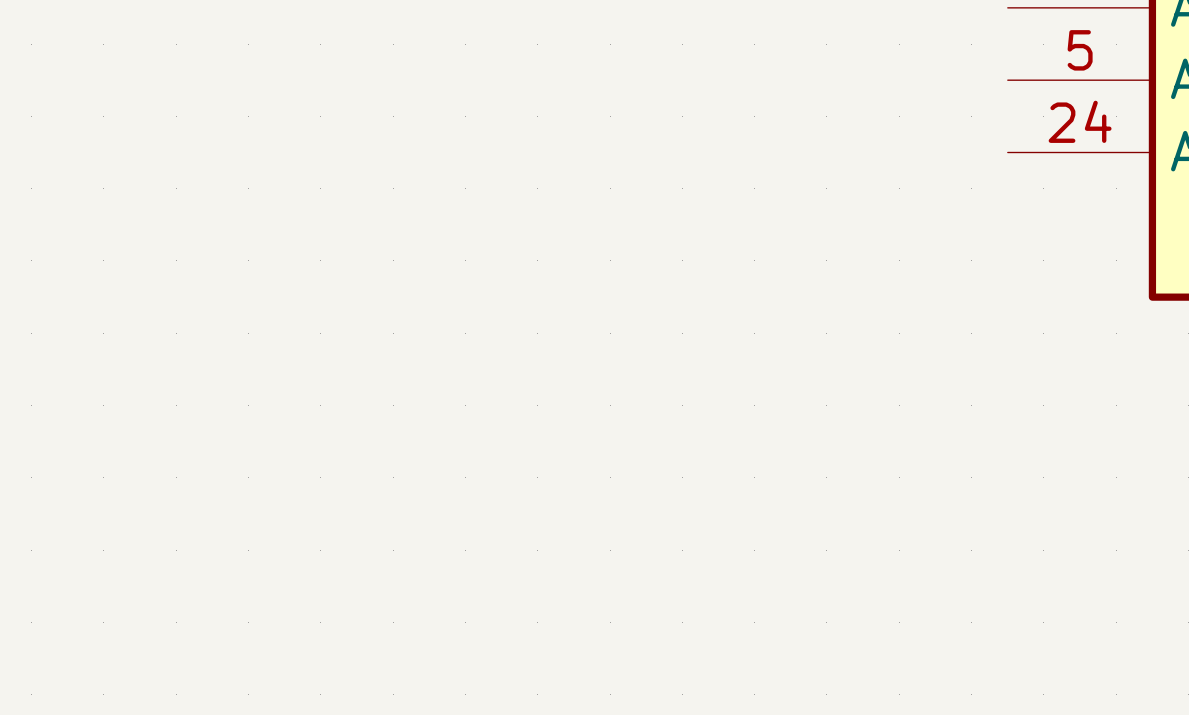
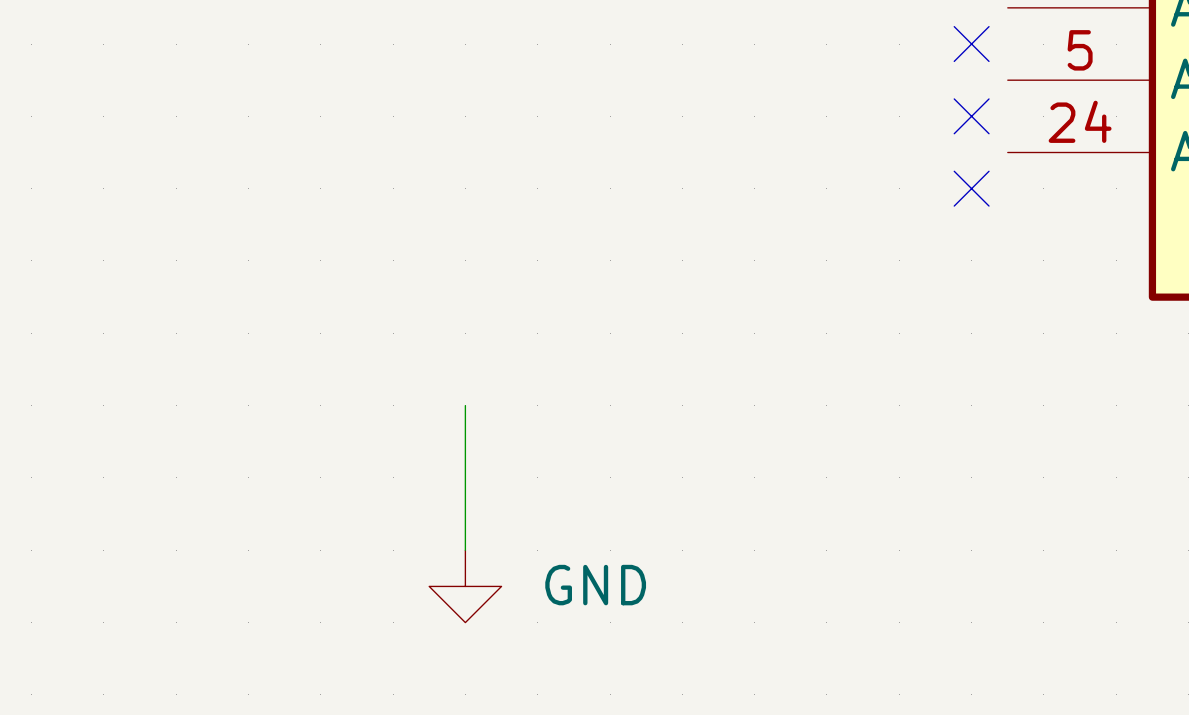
no-connect mark: none -> (971, 44)
no-connect mark: none -> (971, 116)
no-connect mark: none -> (971, 188)
wire: none -> (465, 405) (465, 550)
power symbol: none -> GND (465, 586)

